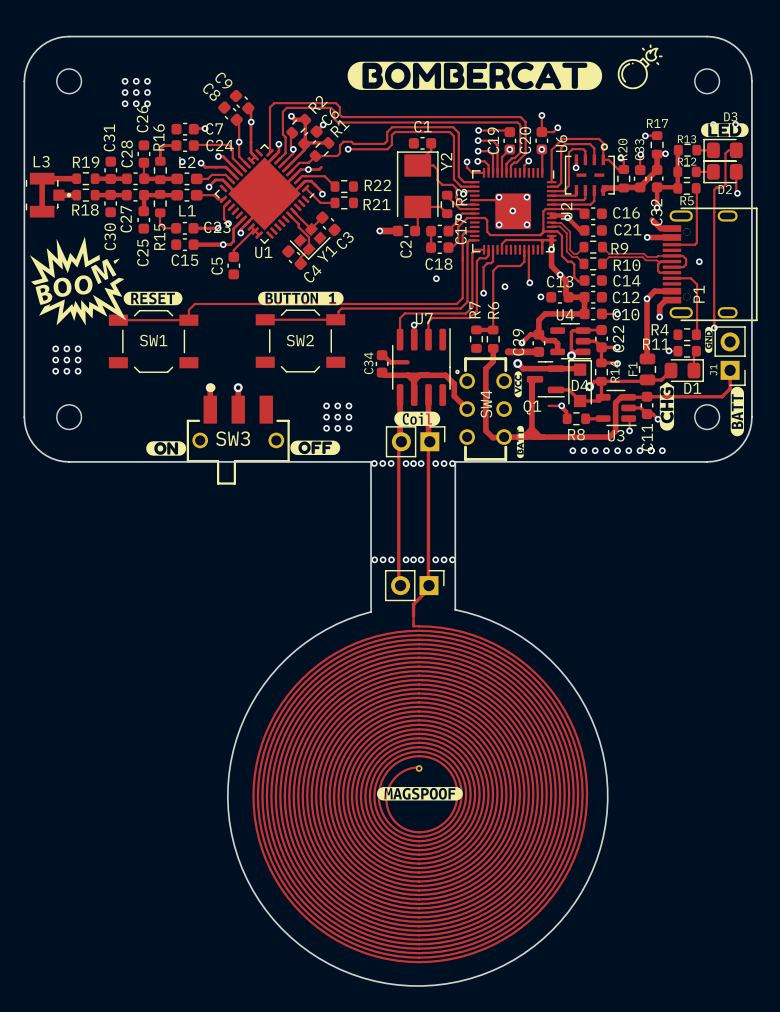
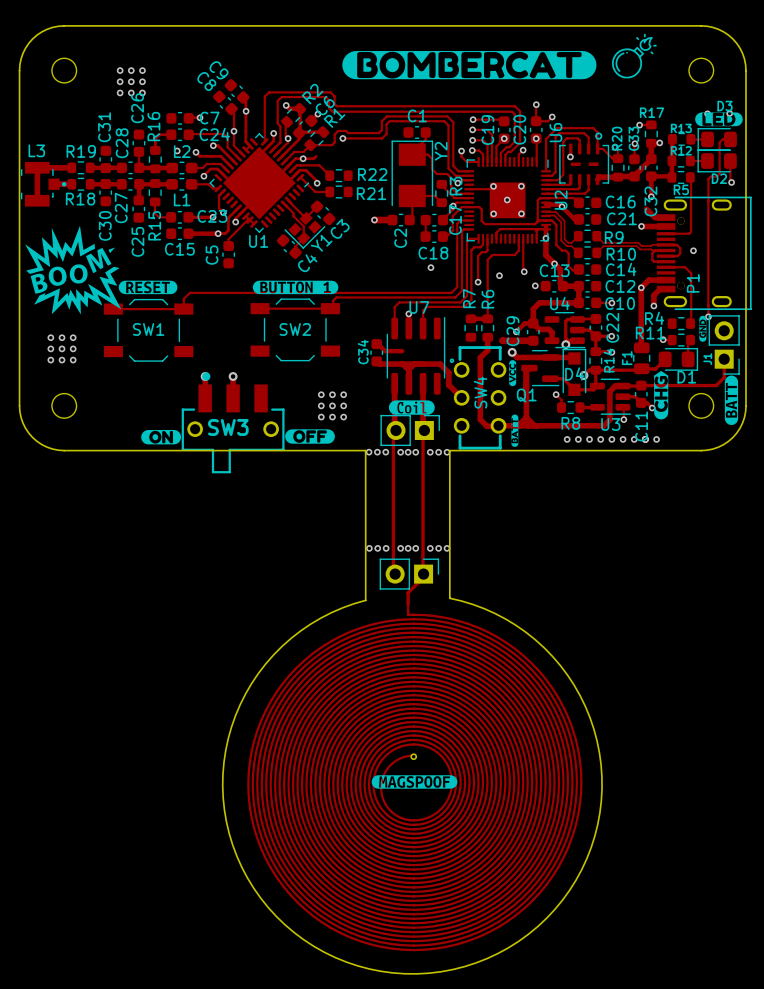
track: (548, 405) (558, 405) (567, 414) -> none

